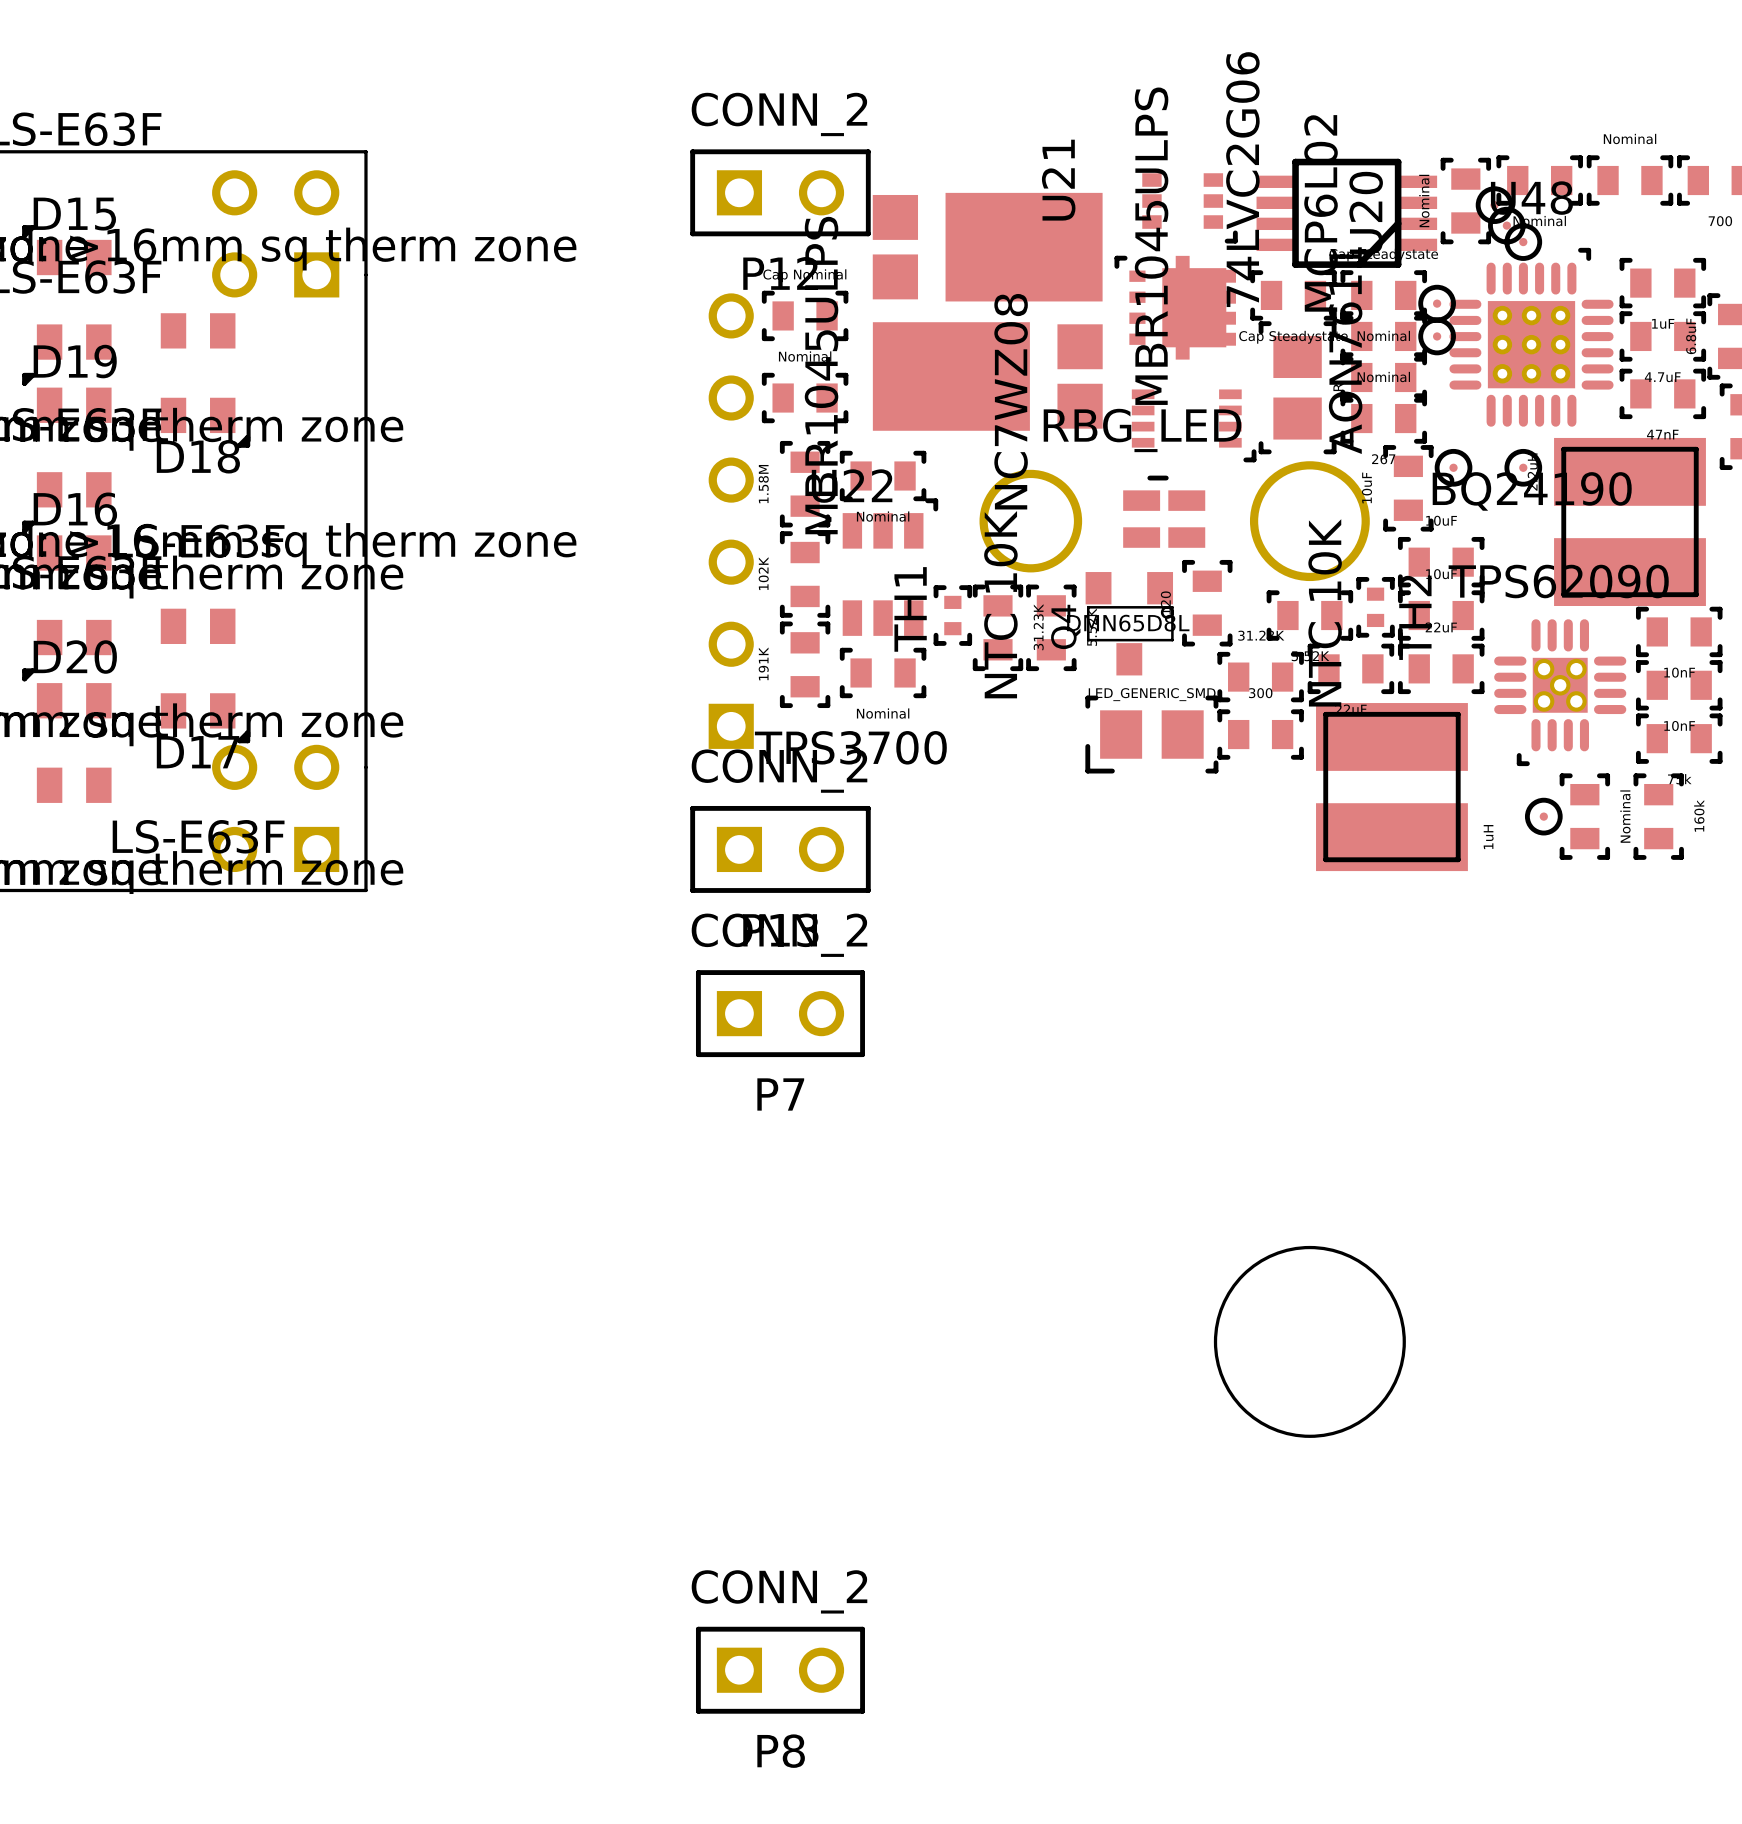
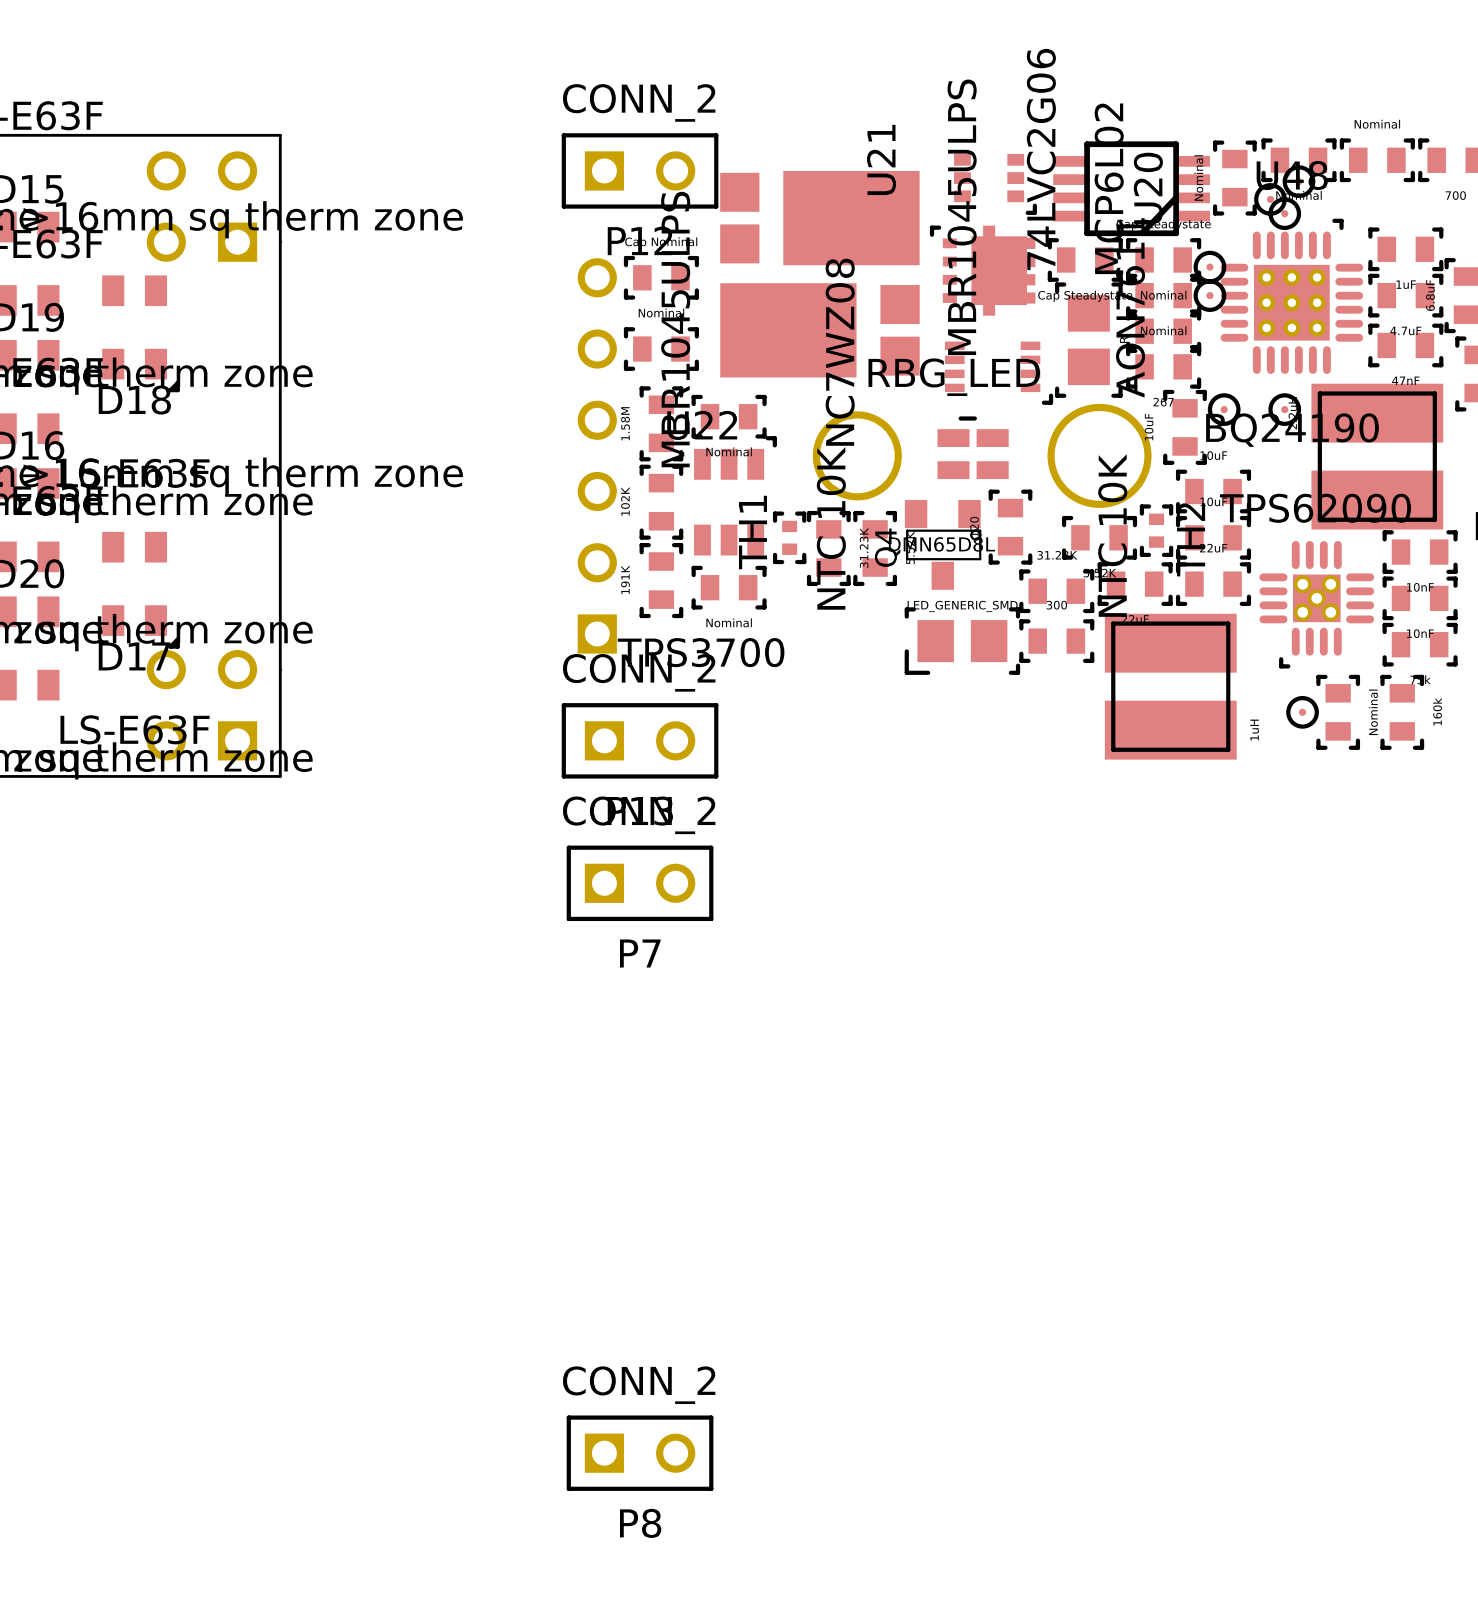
part position: (1494, 205) -> (1298, 181)
round board edge: [1213, 1245, 1406, 1438] -> none

